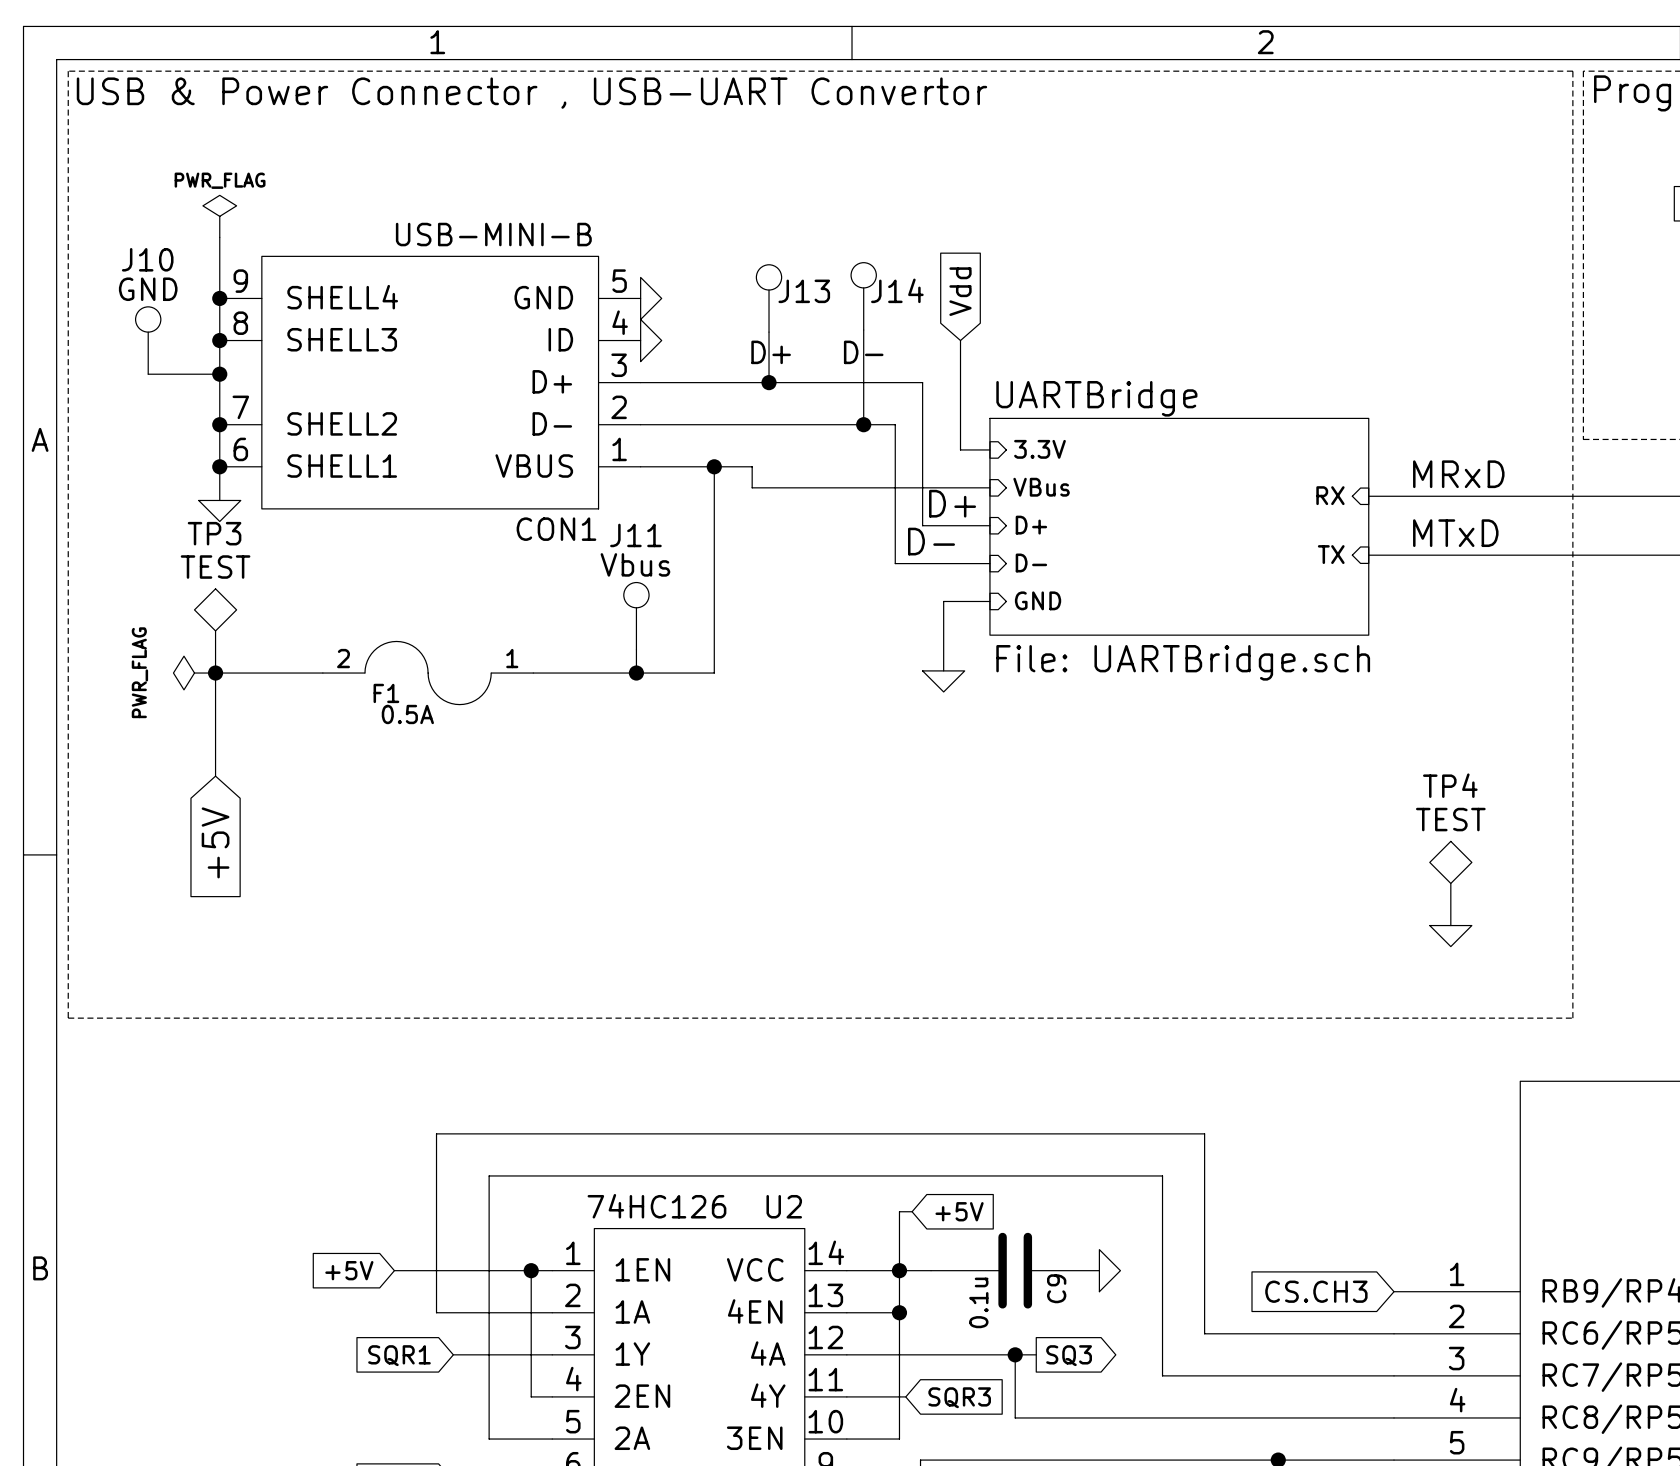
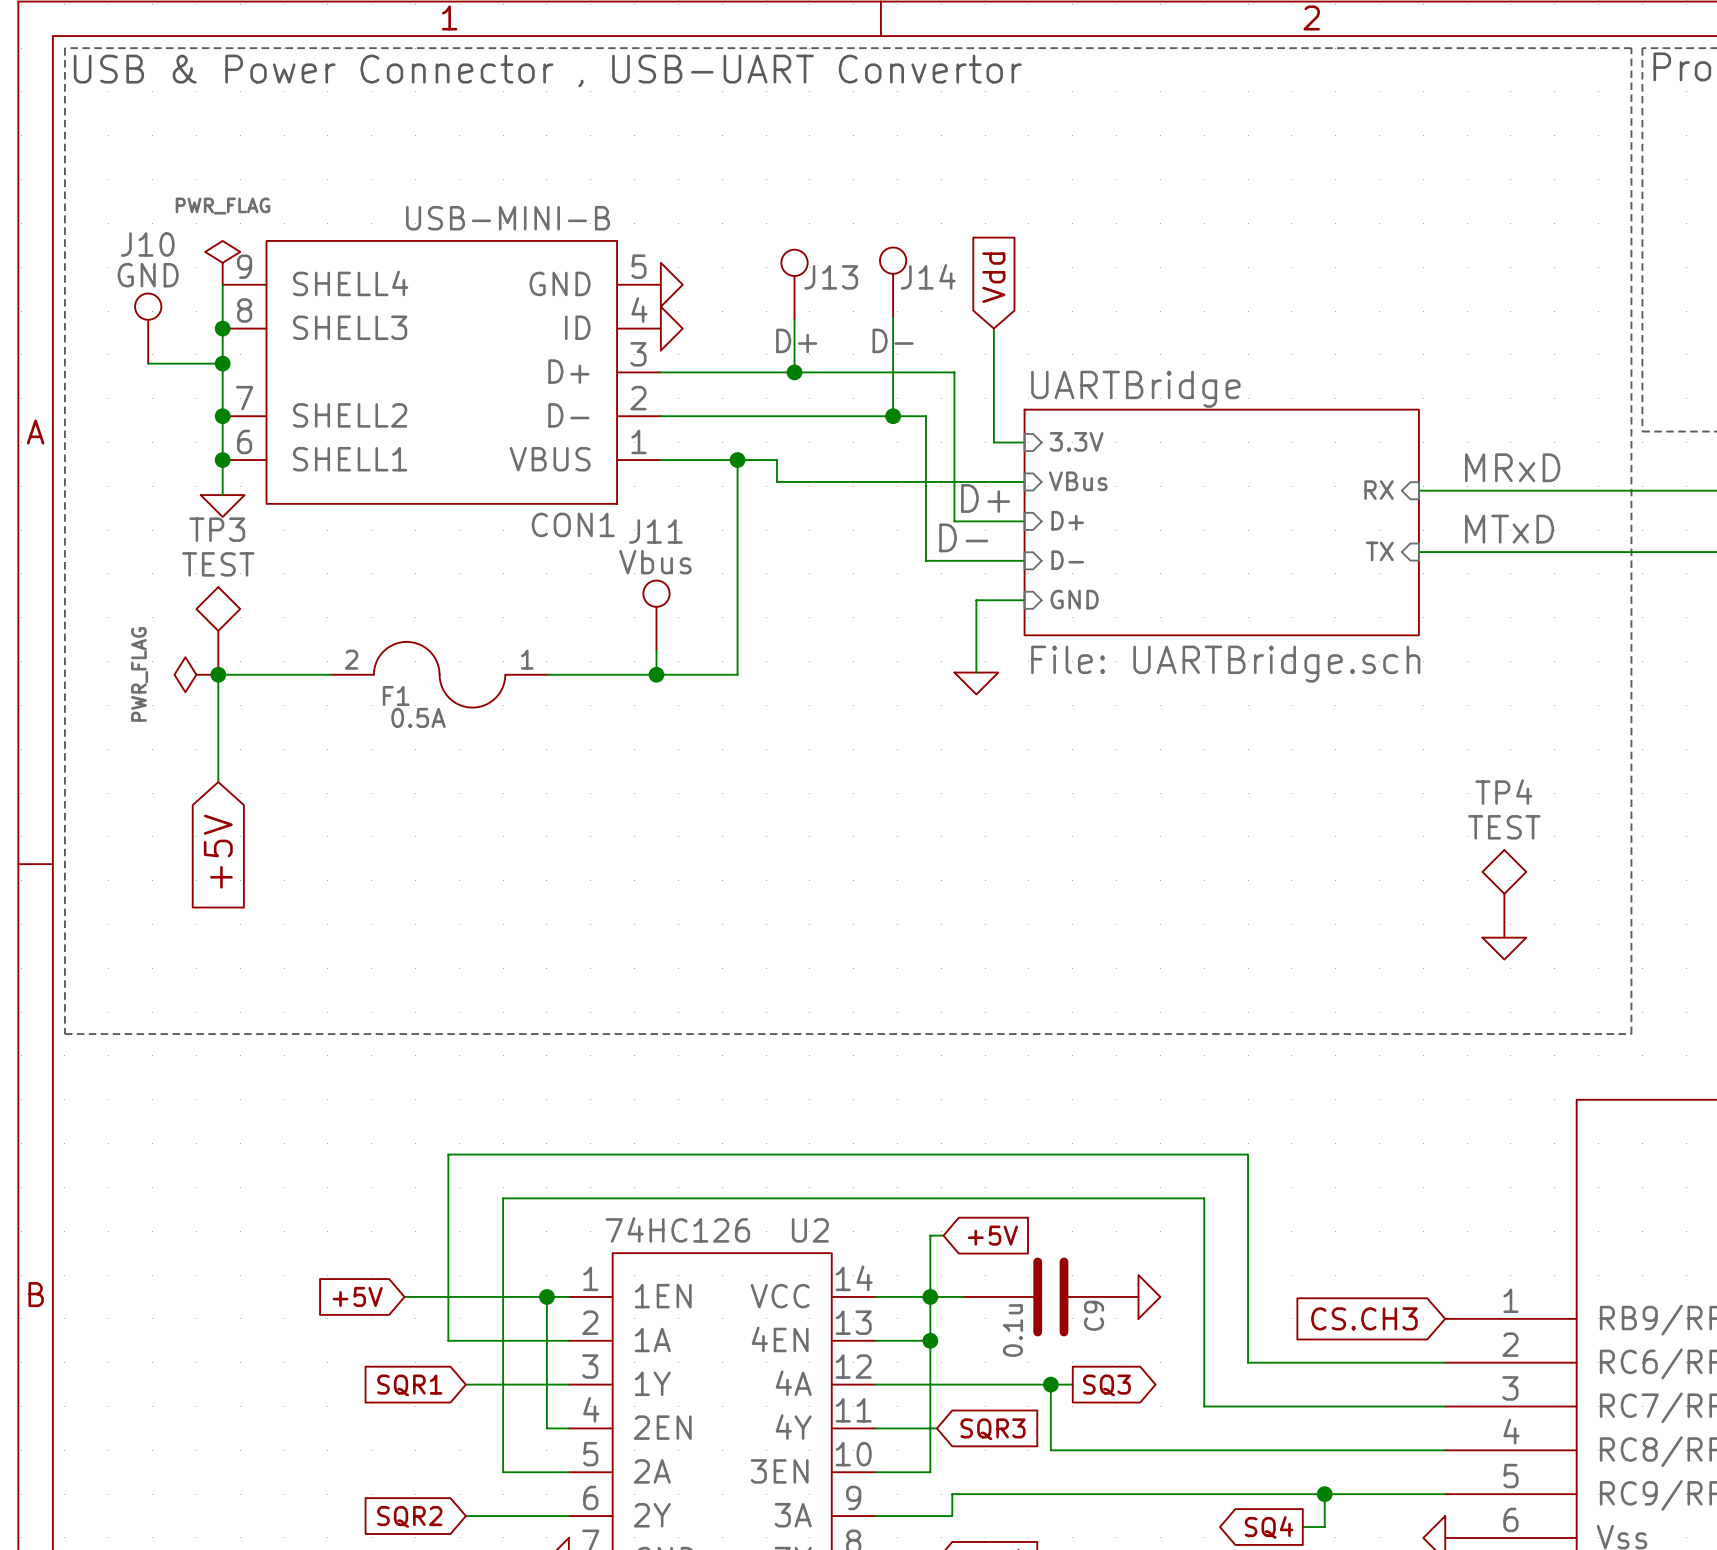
power symbol text position: PWR_FLAG (220, 180) -> PWR_FLAG (223, 206)
power symbol position: PWR_FLAG (219, 216) -> PWR_FLAG (222, 262)
wire: (219, 237) (219, 298) -> none
junction: (219, 298) -> none

